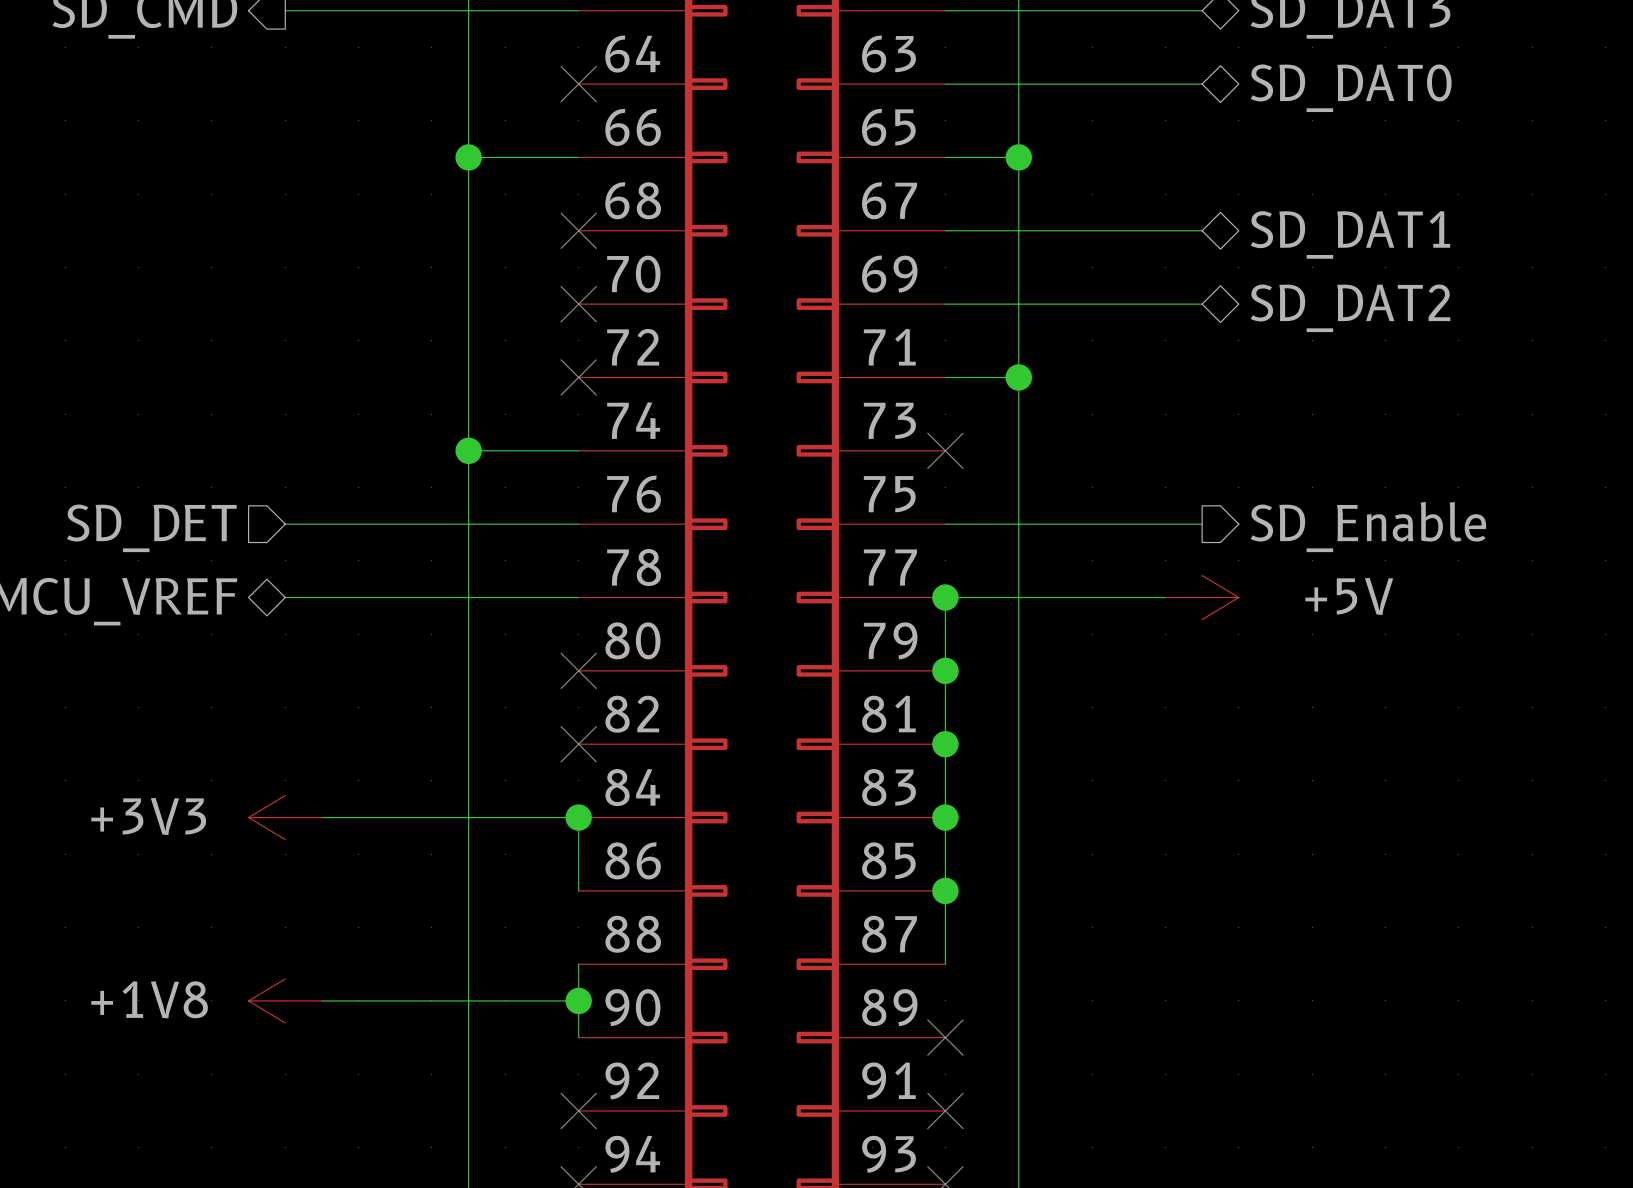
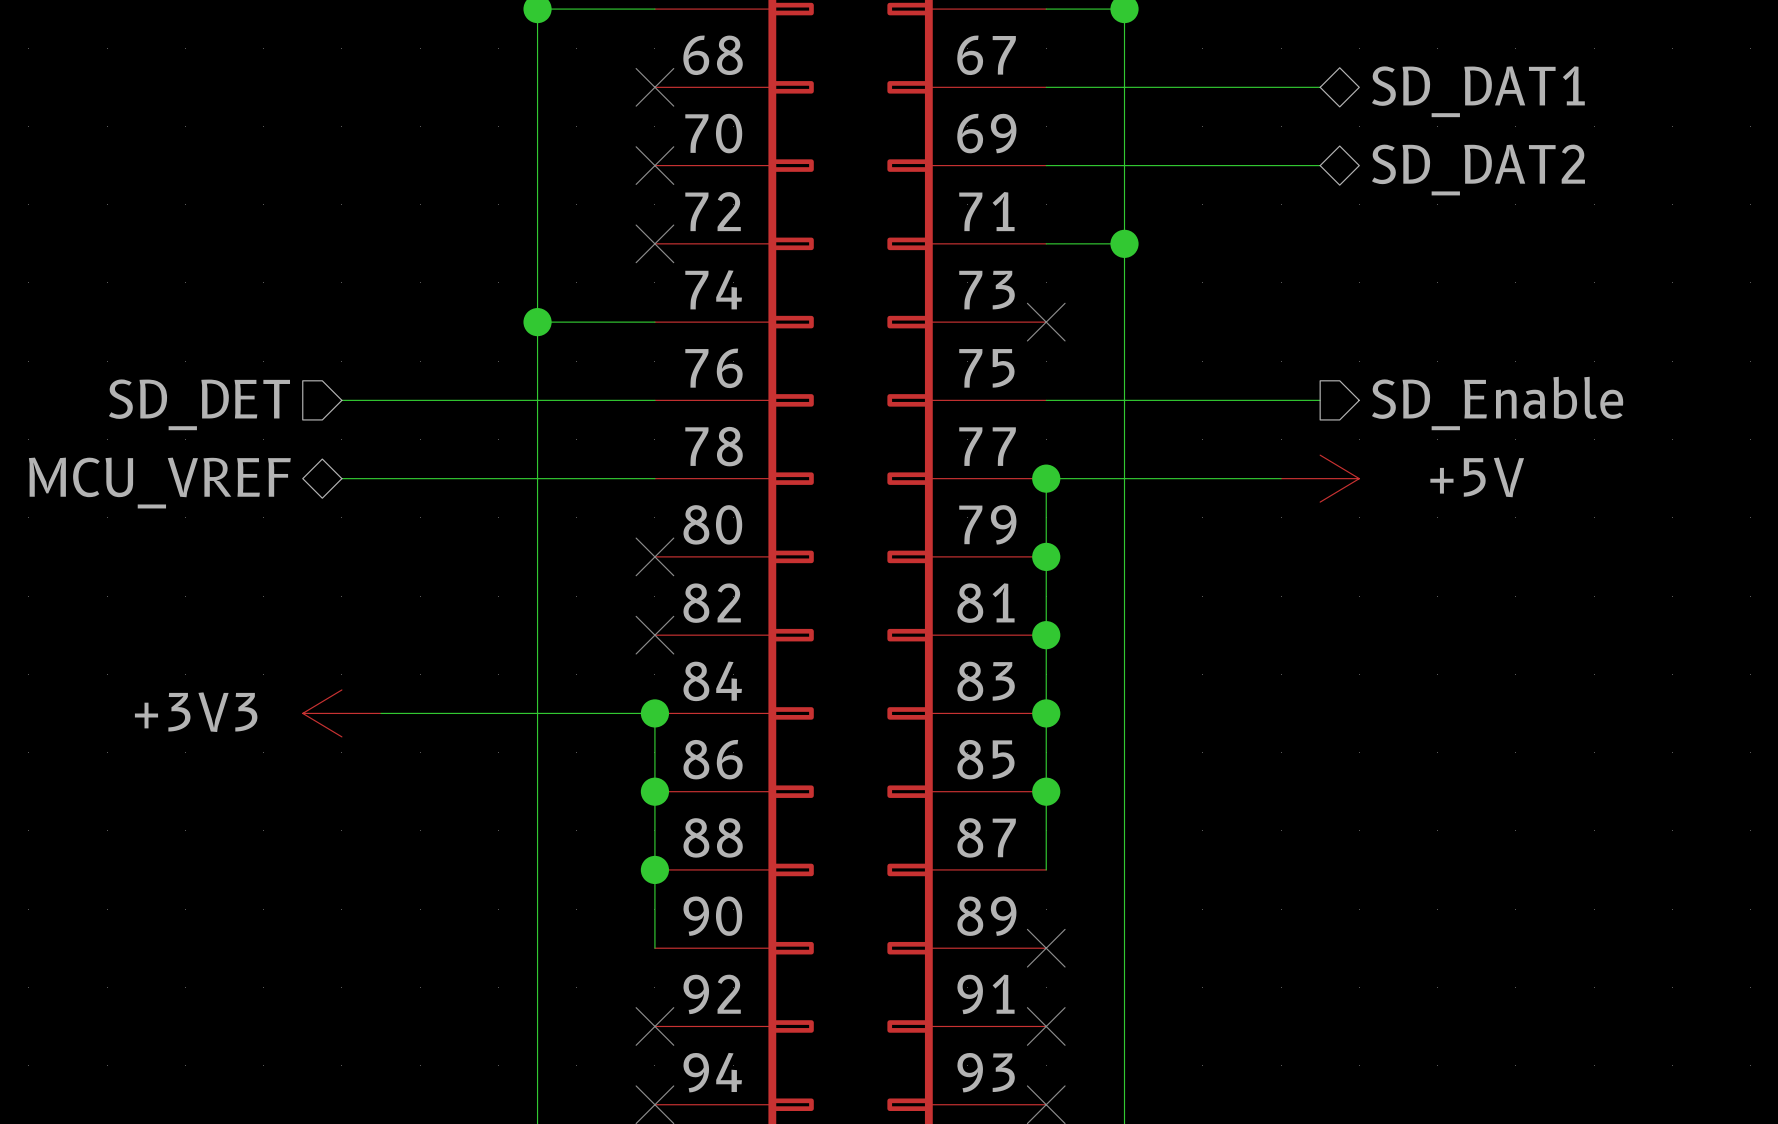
wire: none -> (654, 791) (654, 869)
junction: none -> (654, 791)
power symbol: +1V8 (285, 1000) -> none
wire: (321, 1000) (578, 1000) -> none
junction position: (578, 1000) -> (654, 869)

